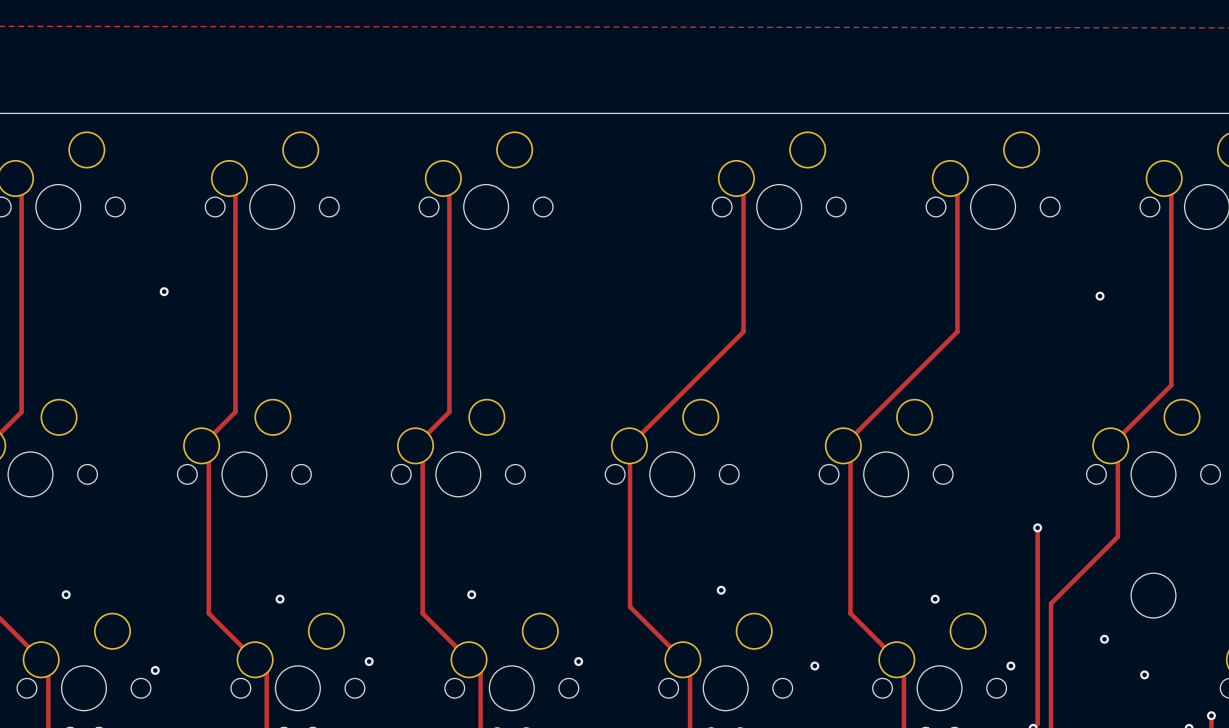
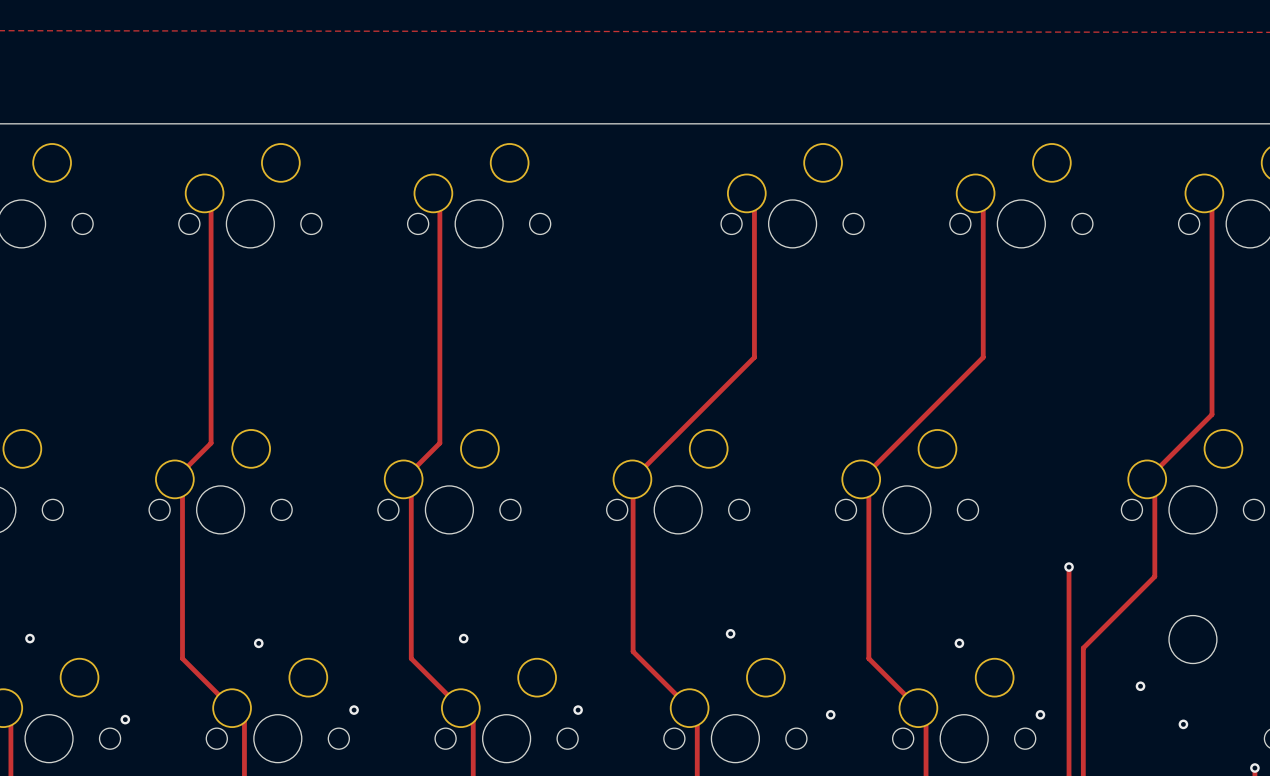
via: (164, 291) -> none
via: (1100, 296) -> none

